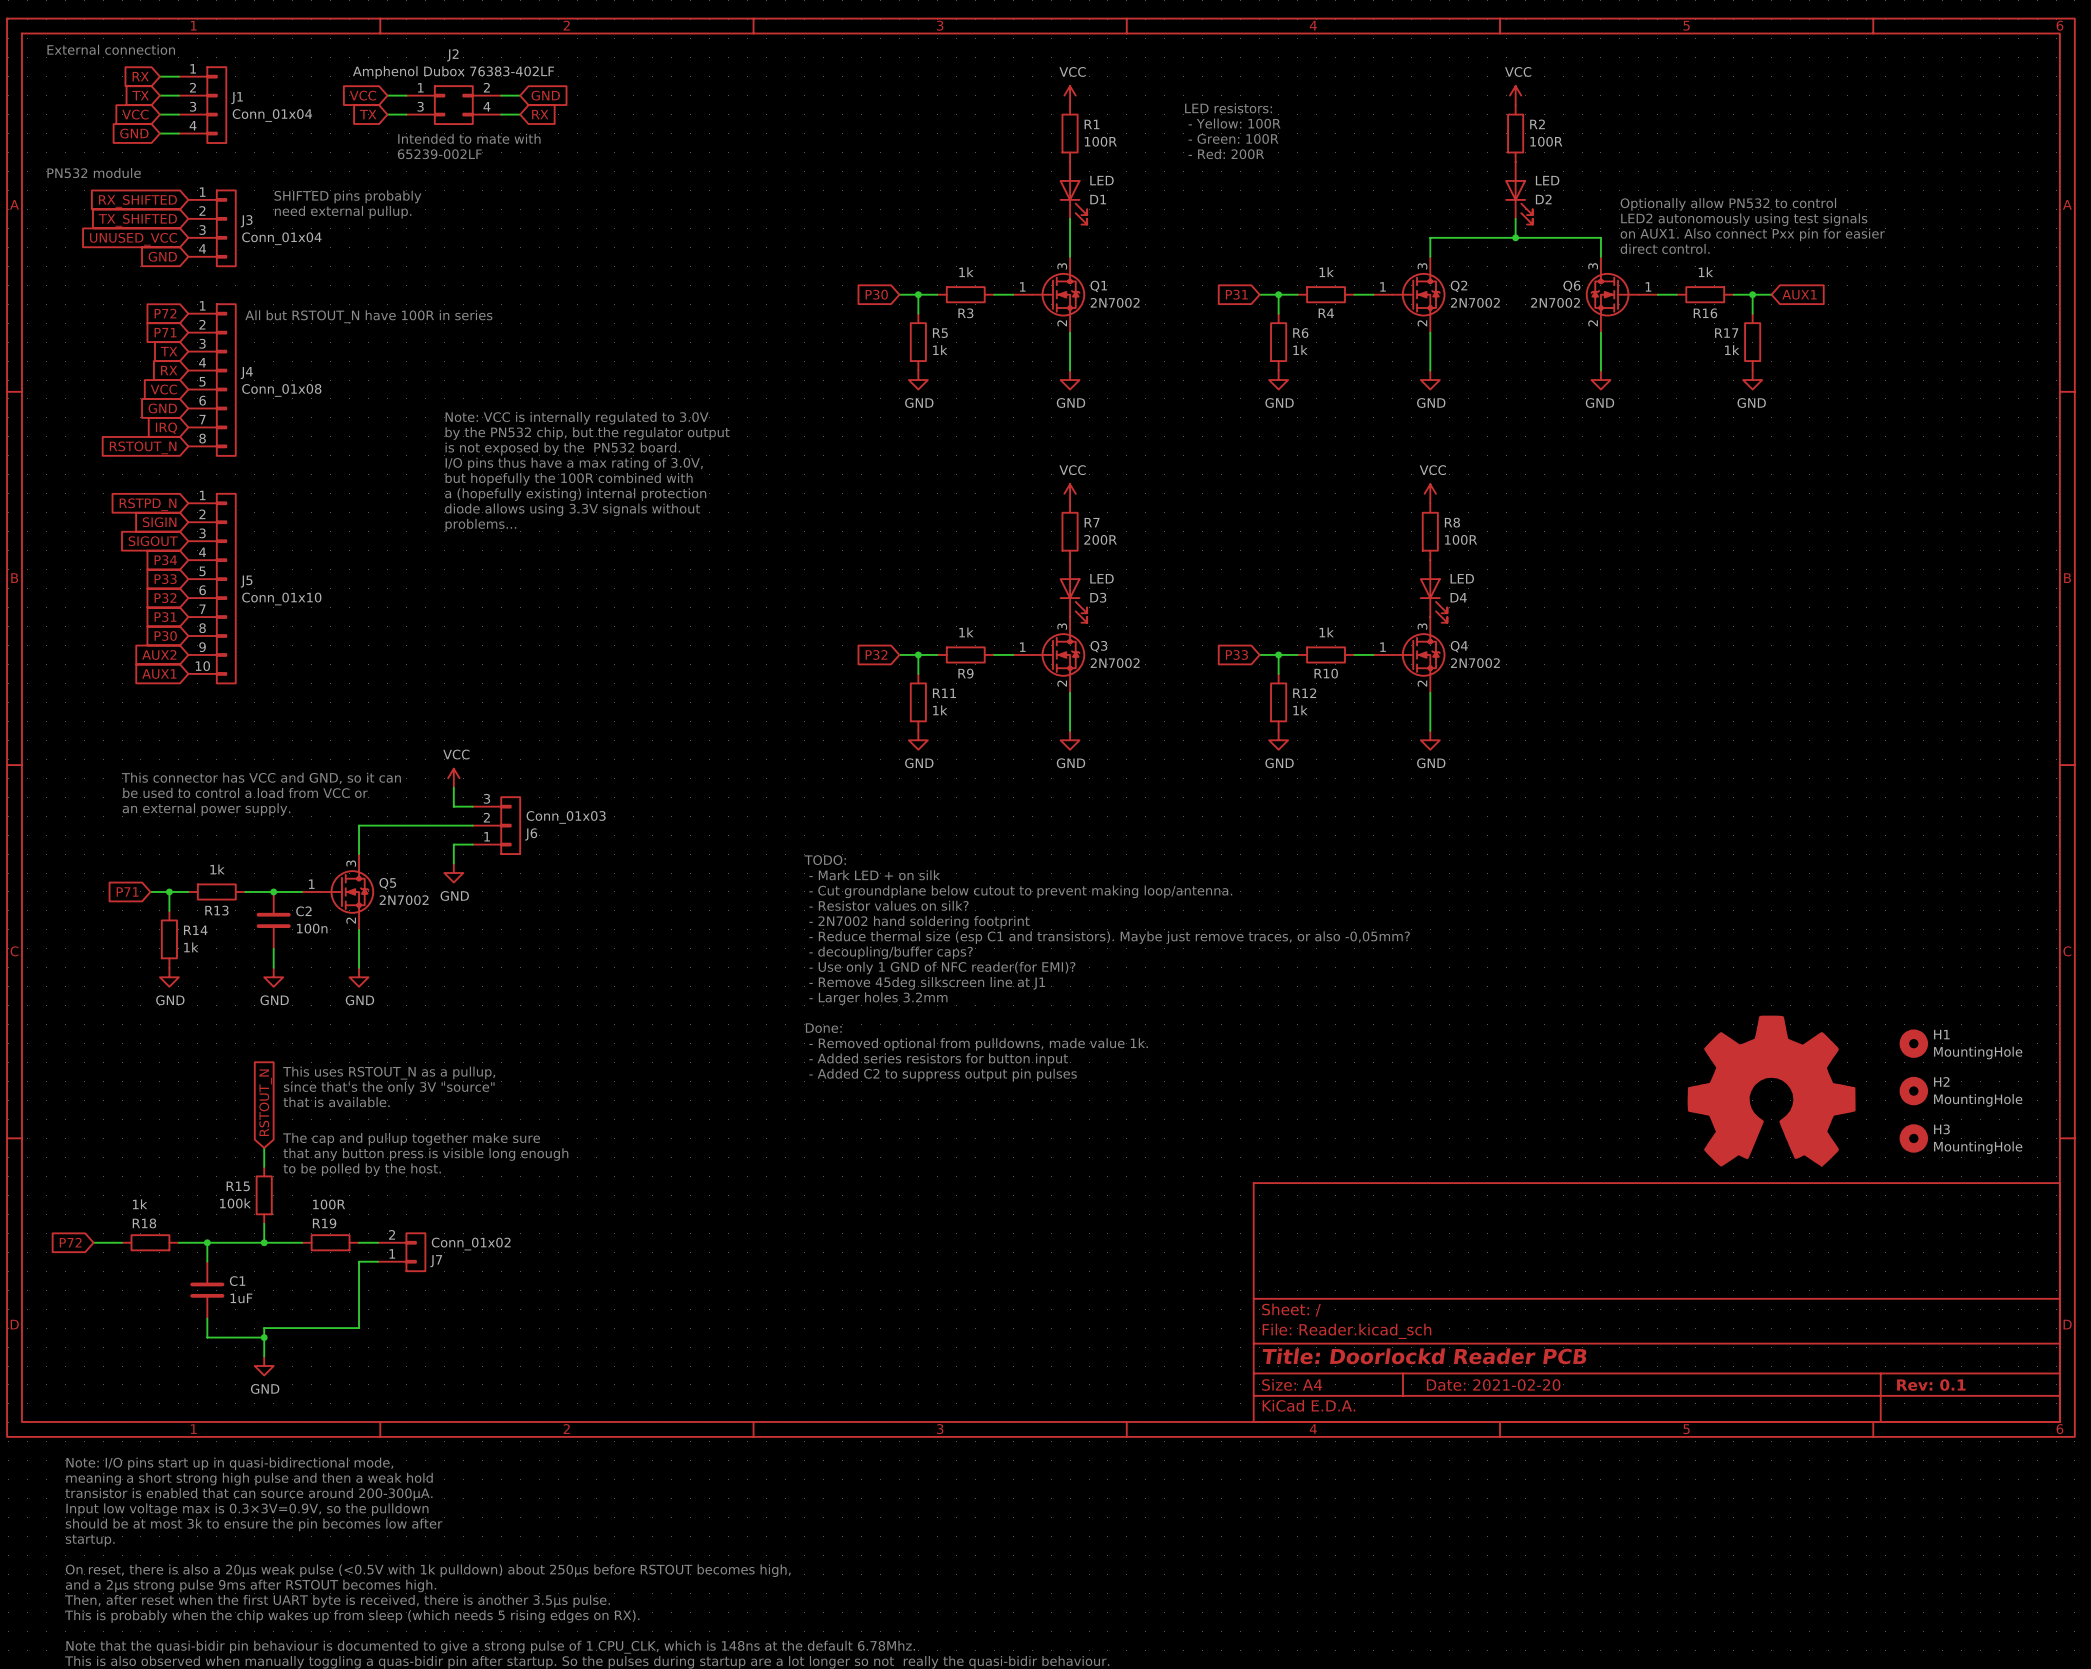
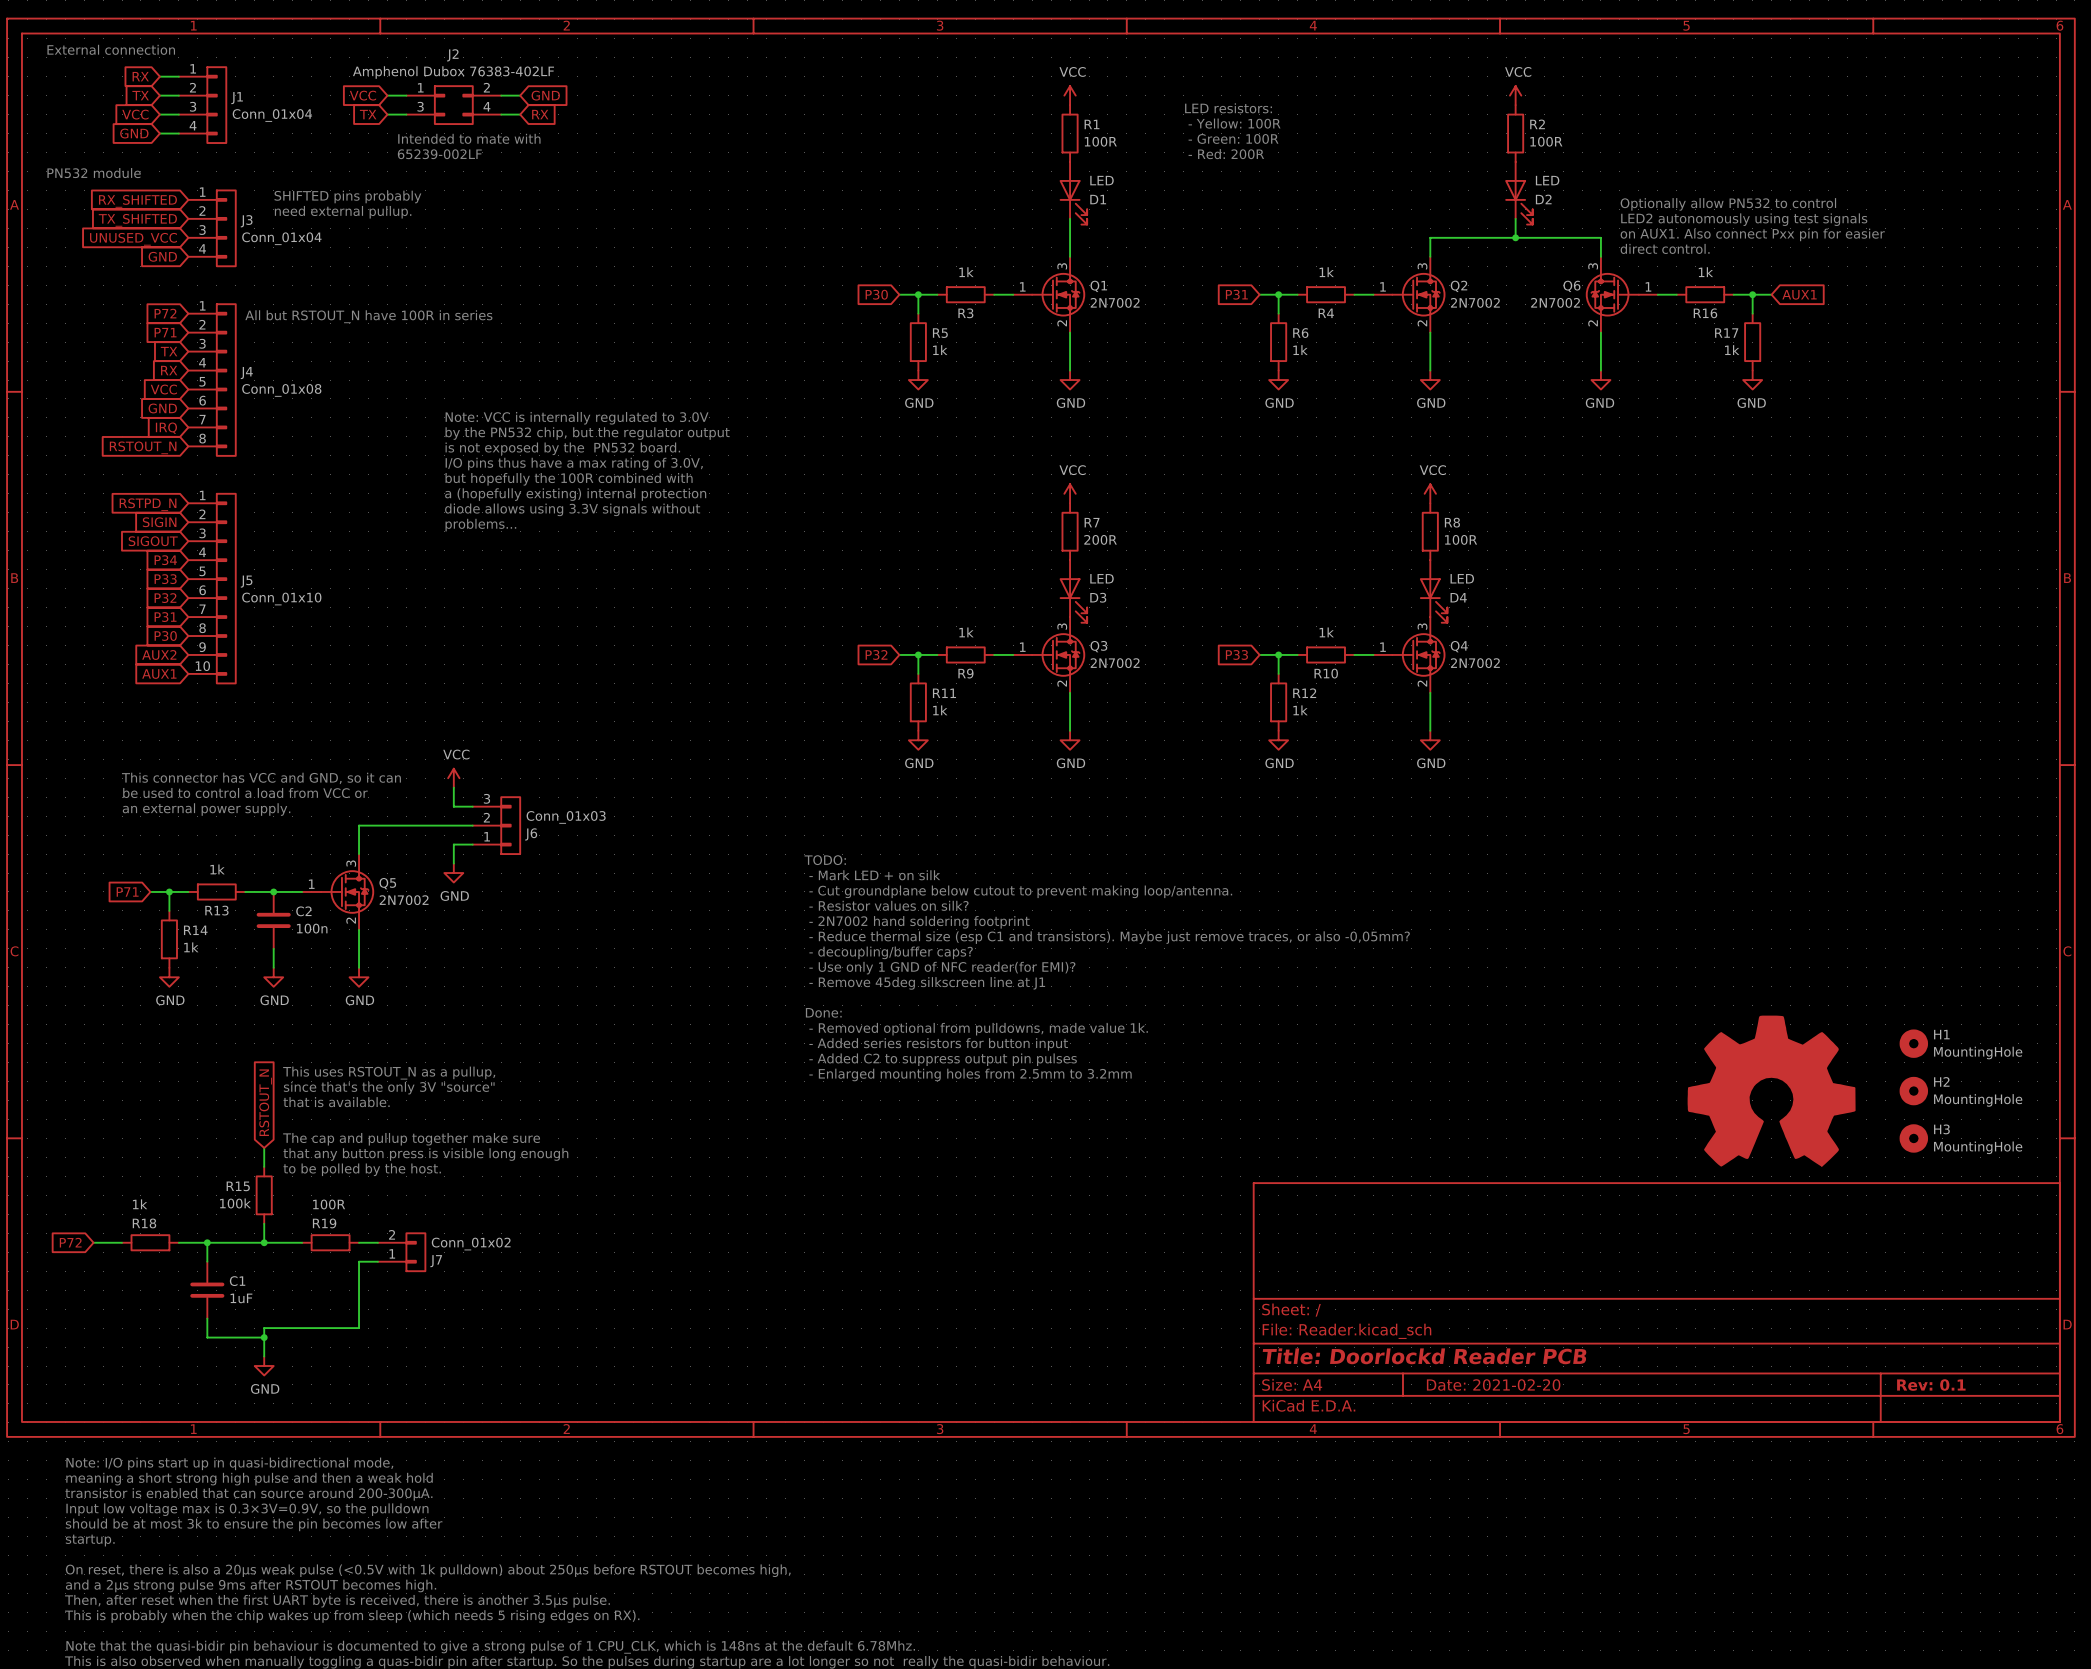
text: - Larger holes 3.2mm (878, 998) -> none
text: none -> Done: (823, 1012)
text: Done: (823, 1028) -> - Removed optional from pulldowns, made value 1k. (978, 1029)
text: - Removed optional from pulldowns, made value 1k. (978, 1044) -> - Added series resistors for button input (938, 1044)
text: - Added series resistors for button input (938, 1059) -> - Added C2 to suppress output pin pulses (943, 1059)
text: - Added C2 to suppress output pin pulses (943, 1074) -> - Enlarged mounting holes from 2.5mm to 3.2mm (970, 1074)

